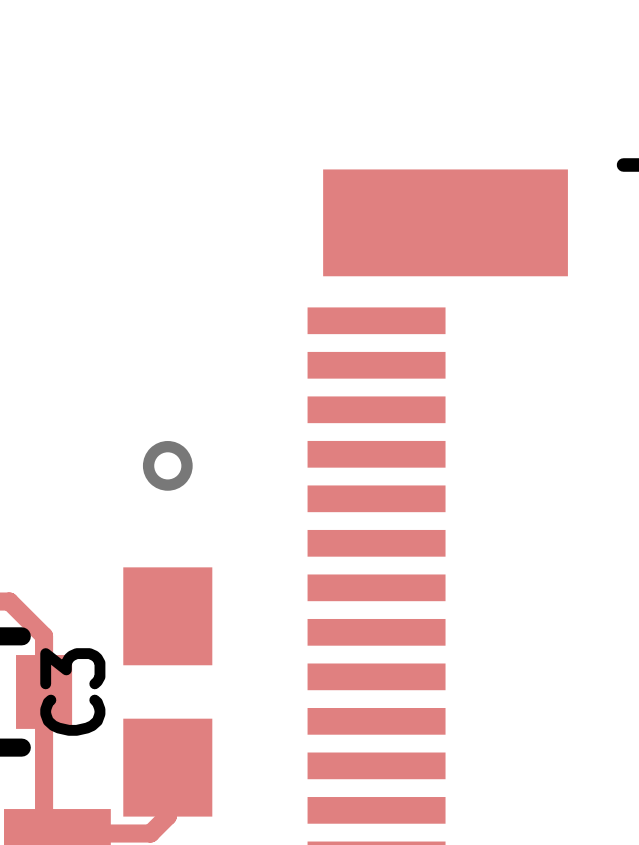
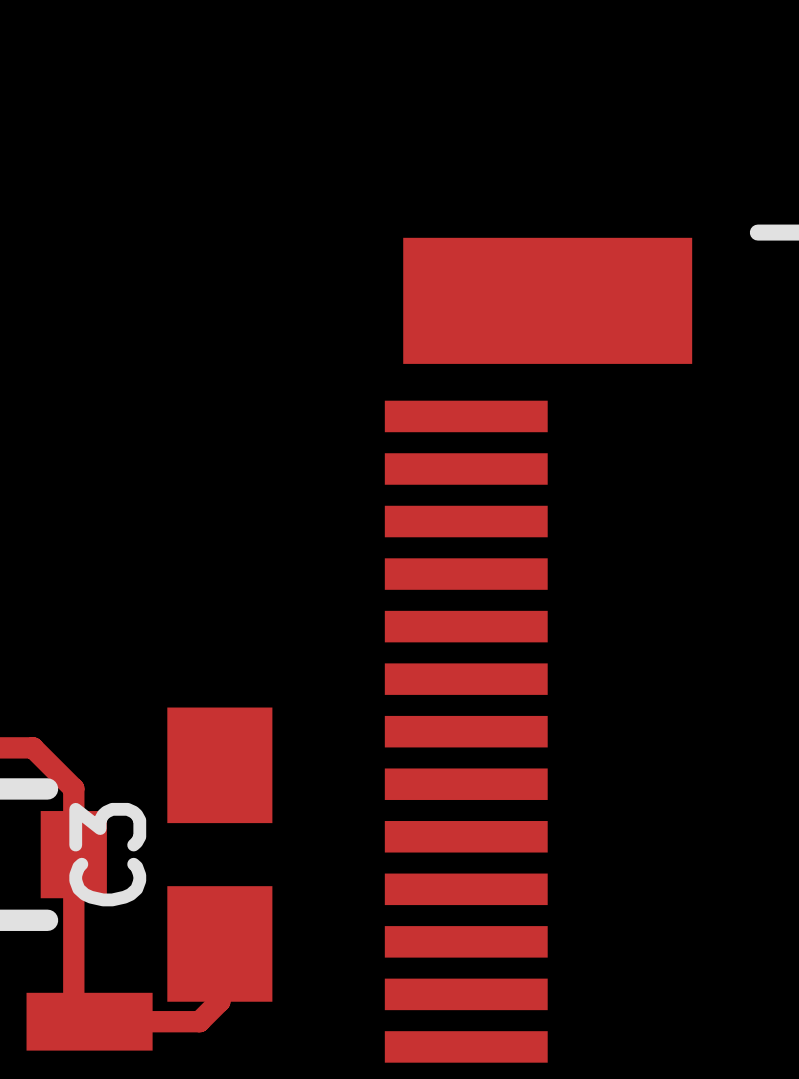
via: (167, 465) -> none

